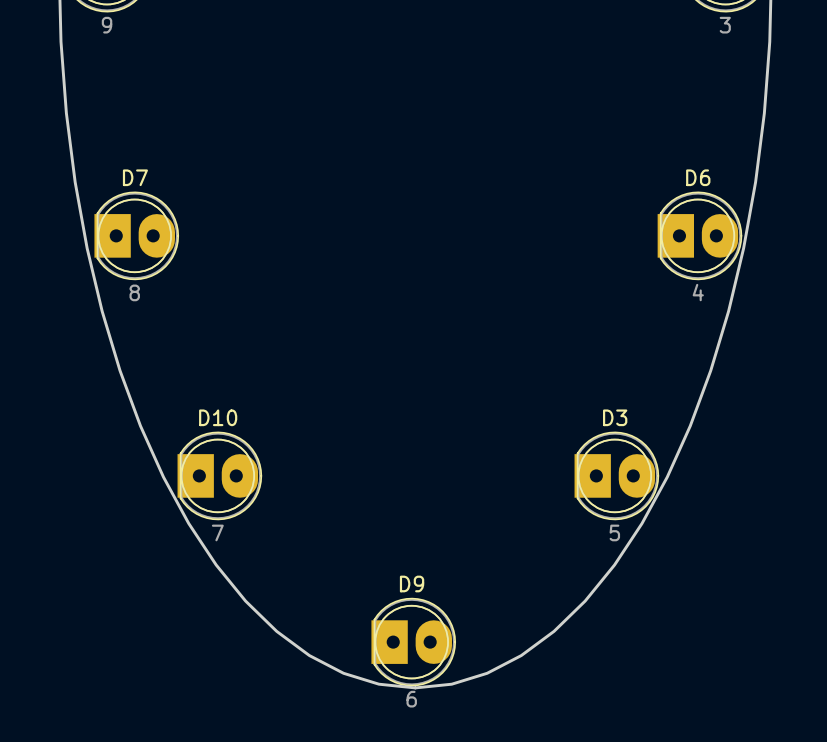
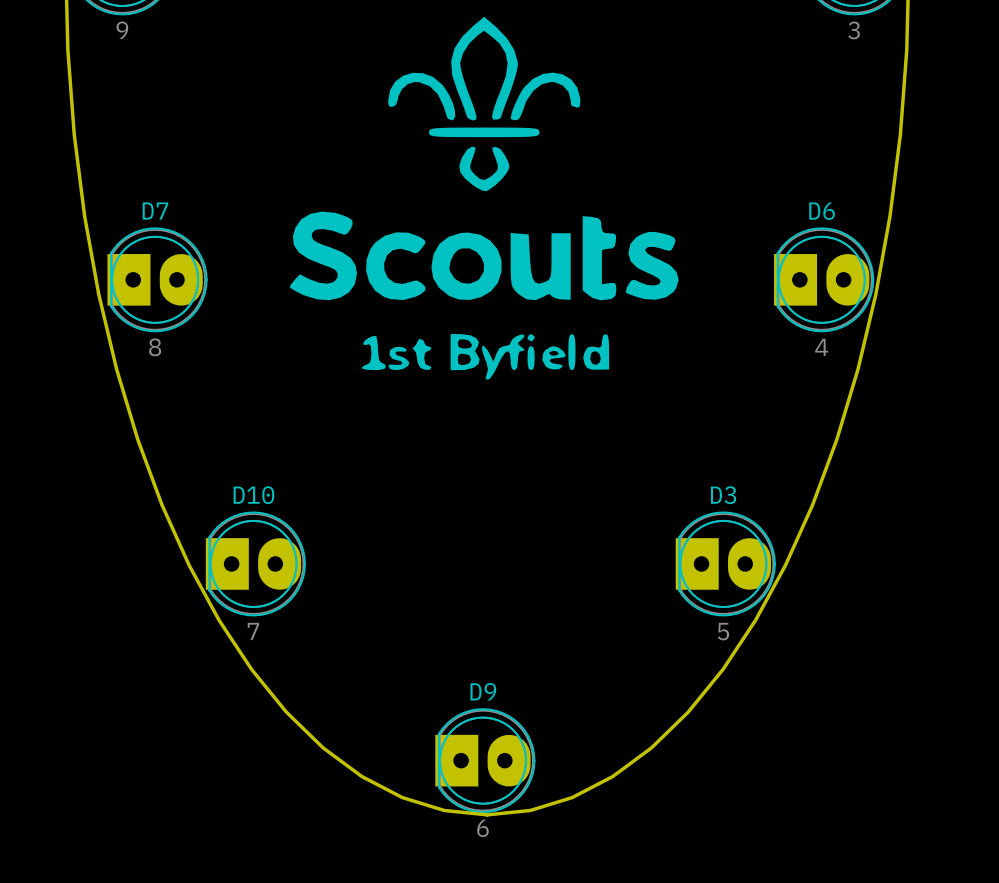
drawing: none -> [289, 16, 679, 380]

